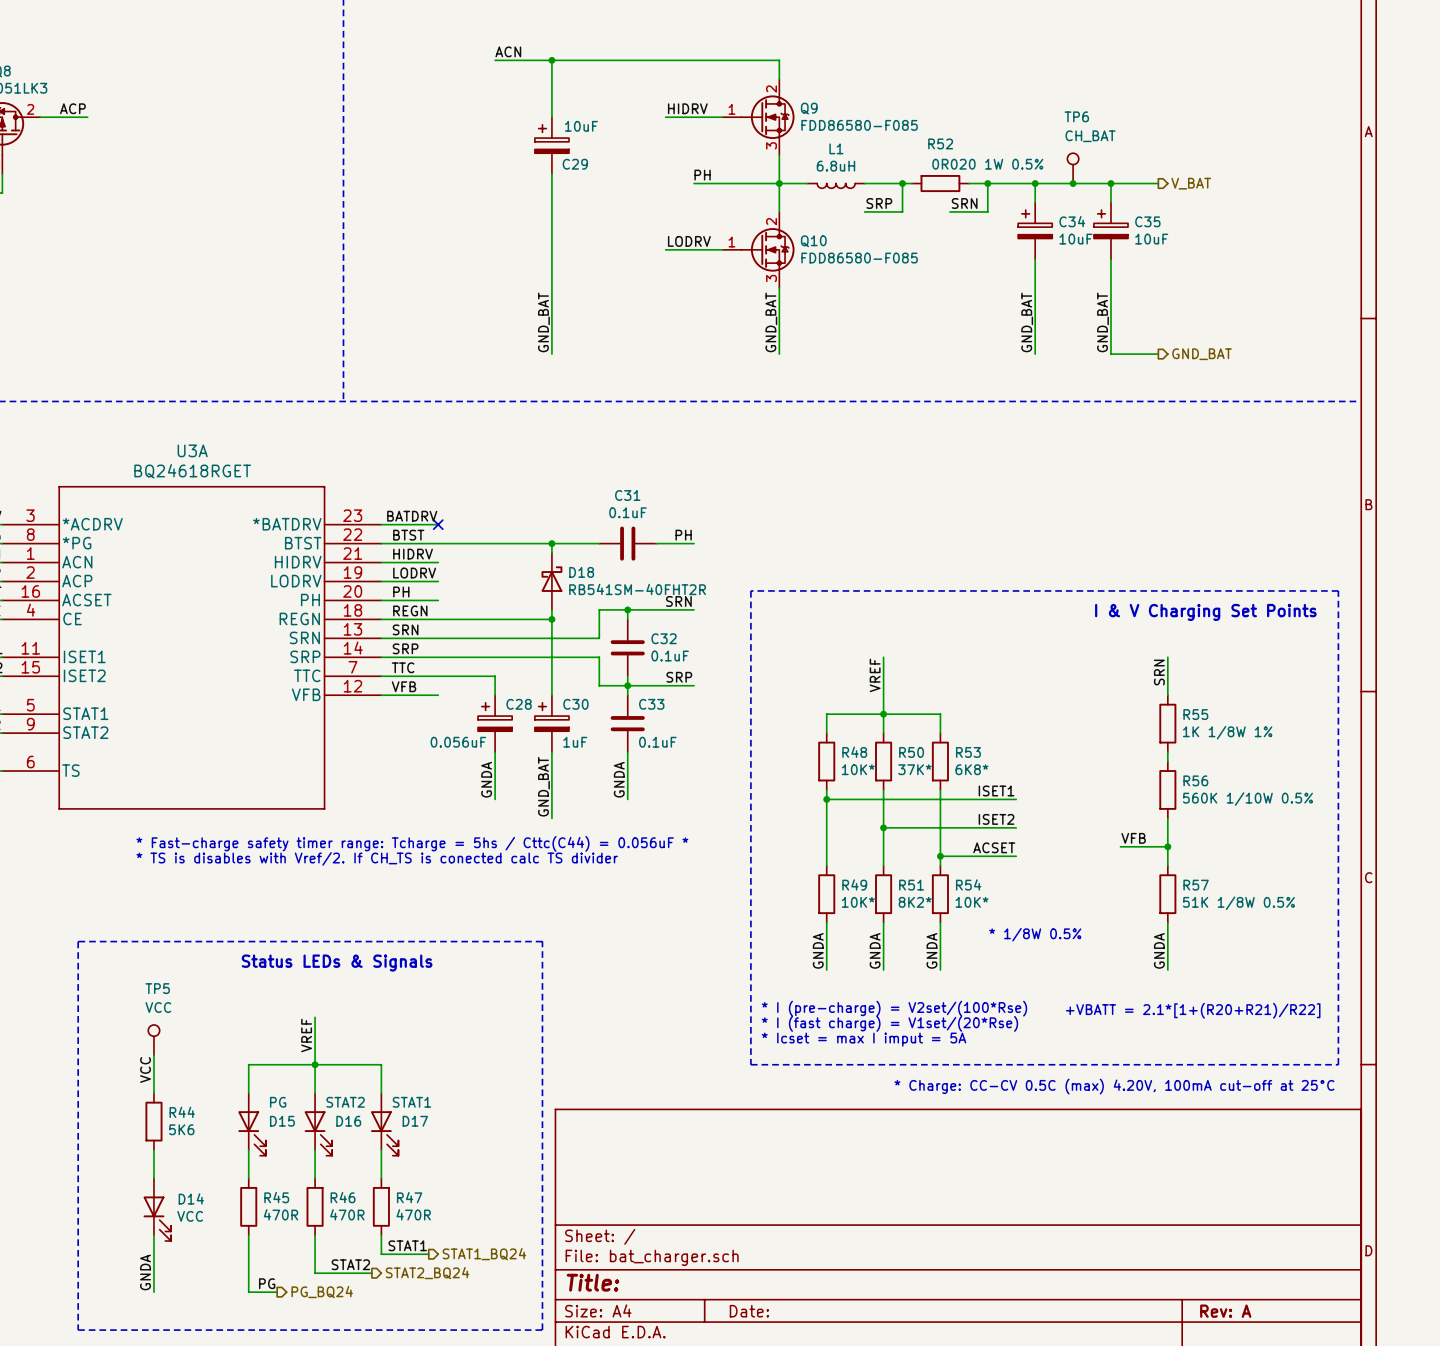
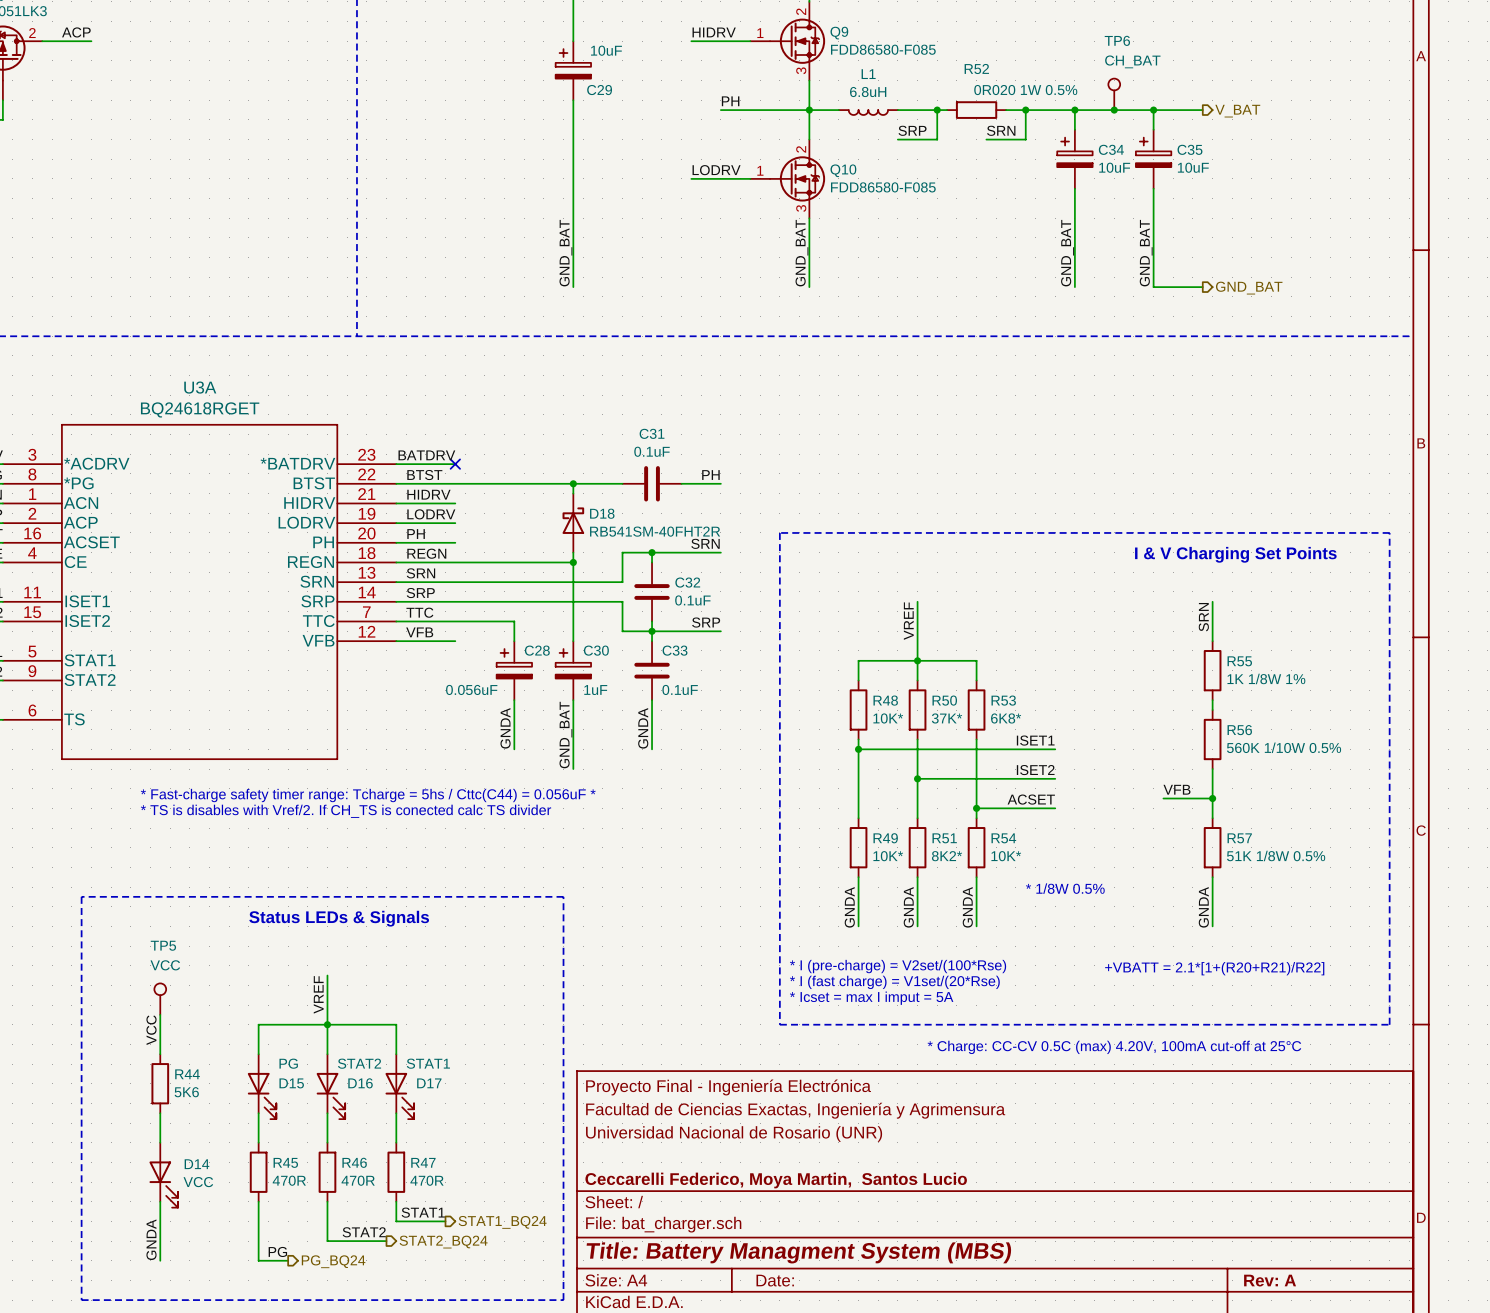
title block: none -> Proyecto Final - Ingeniería Electrónica (728, 1087)
title block: none -> Facultad de Ciencias Exactas, Ingeniería y Agrimensura (795, 1110)
title block: none -> Universidad Nacional de Rosario (UNR) (734, 1134)
title block: none -> Ceccarelli Federico, Moya Martin, Santos Lucio (776, 1180)
title block: Title: (593, 1282) -> Title: Battery Managment System (MBS) (798, 1252)

